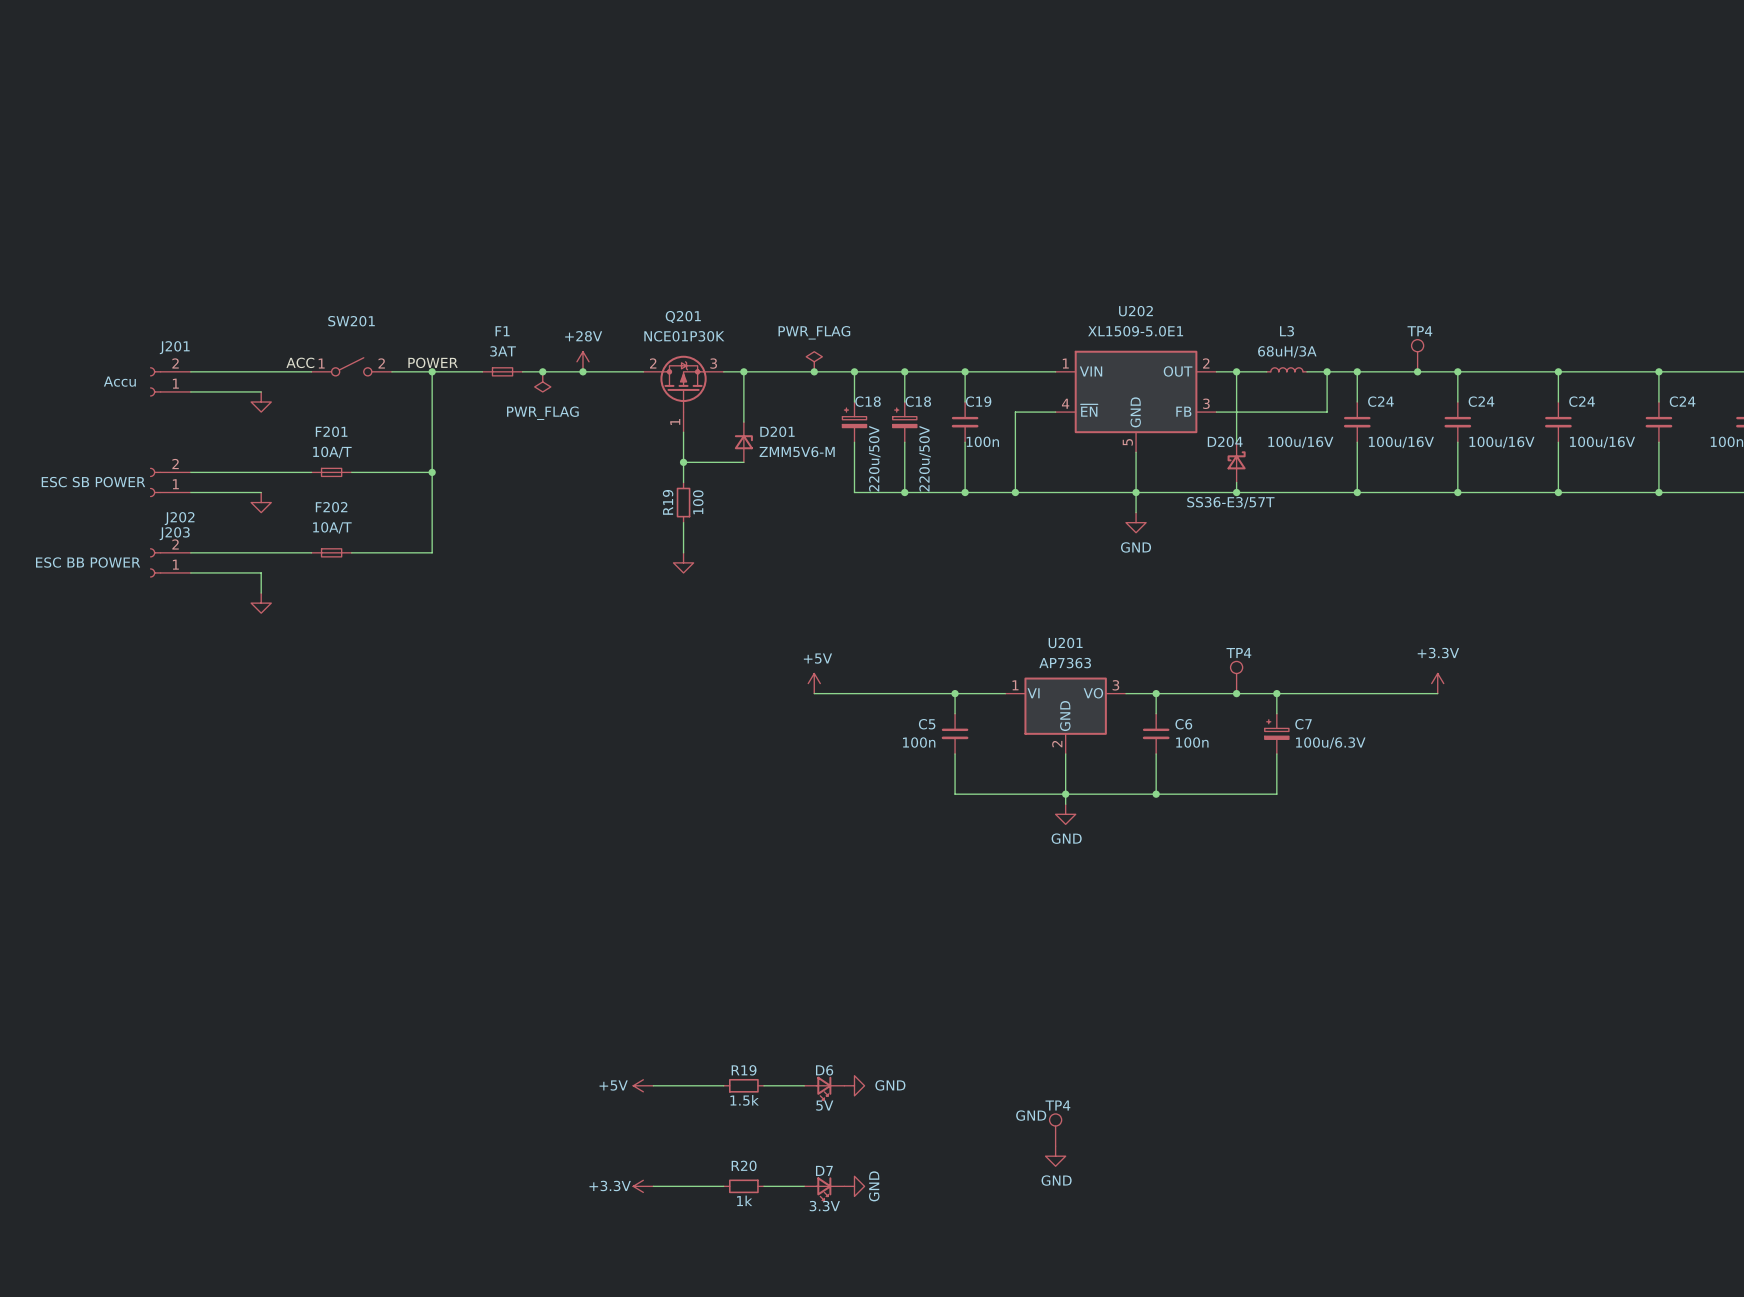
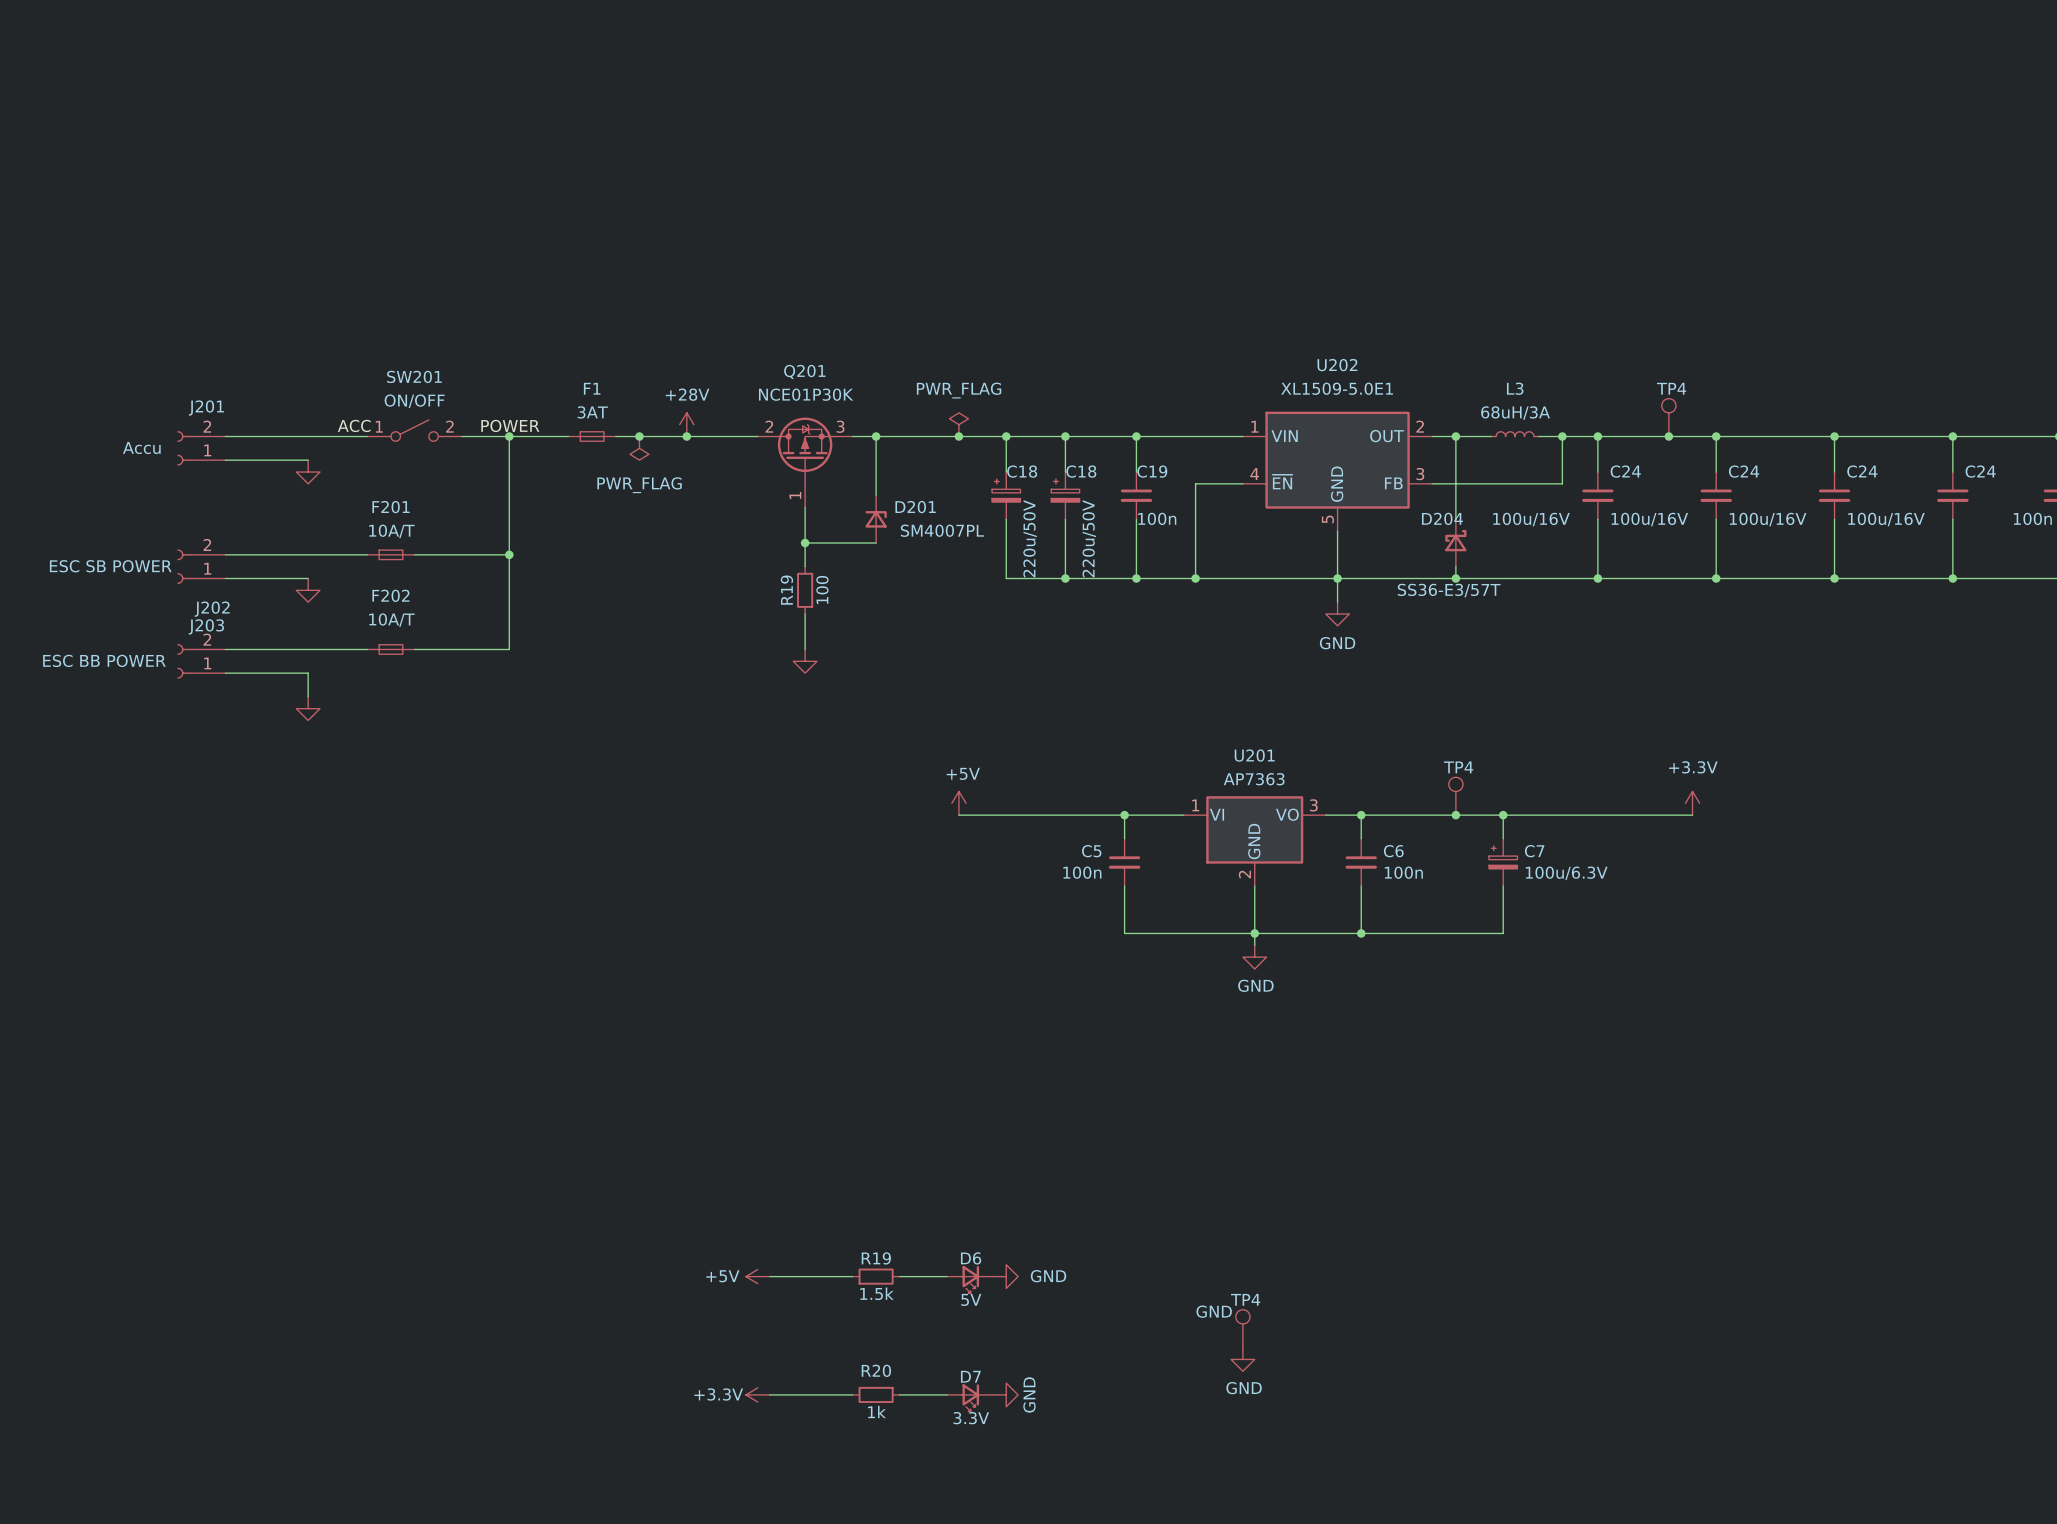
SW201 value: none -> ON/OFF (414, 401)
D201 value: ZMM5V6-M (797, 451) -> SM4007PL (942, 530)

